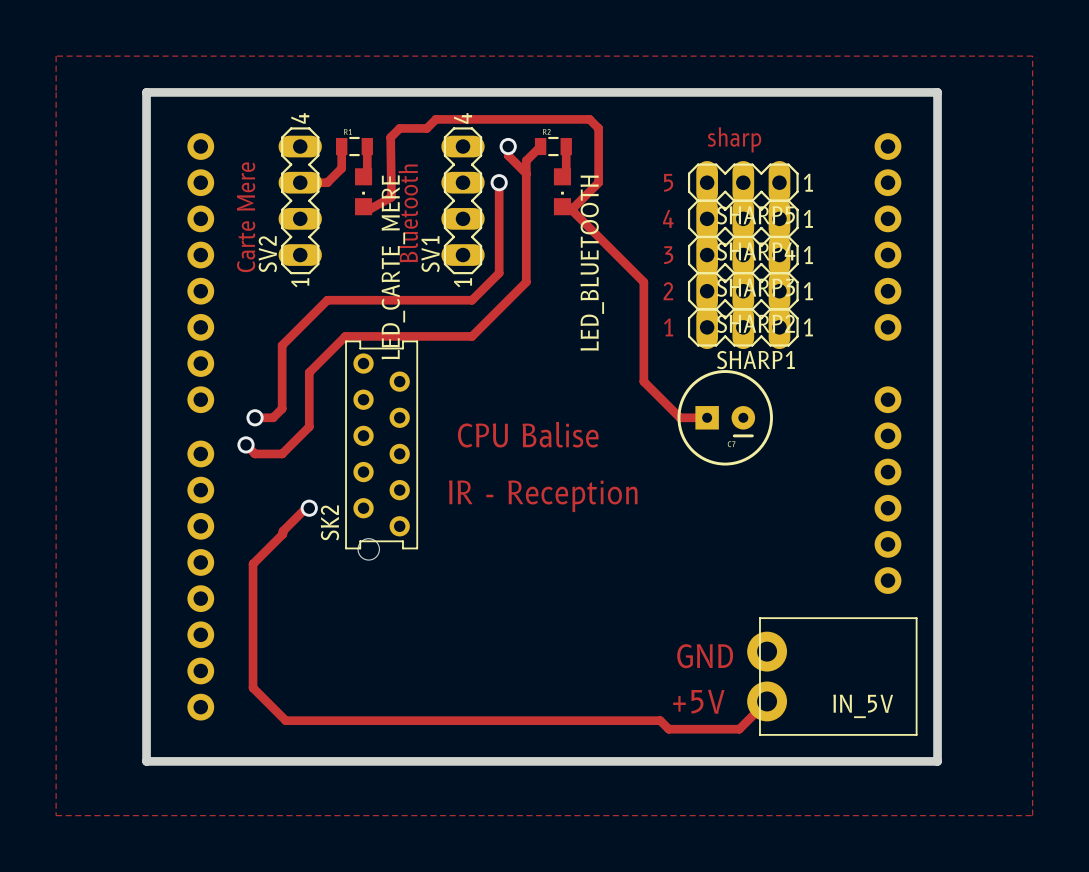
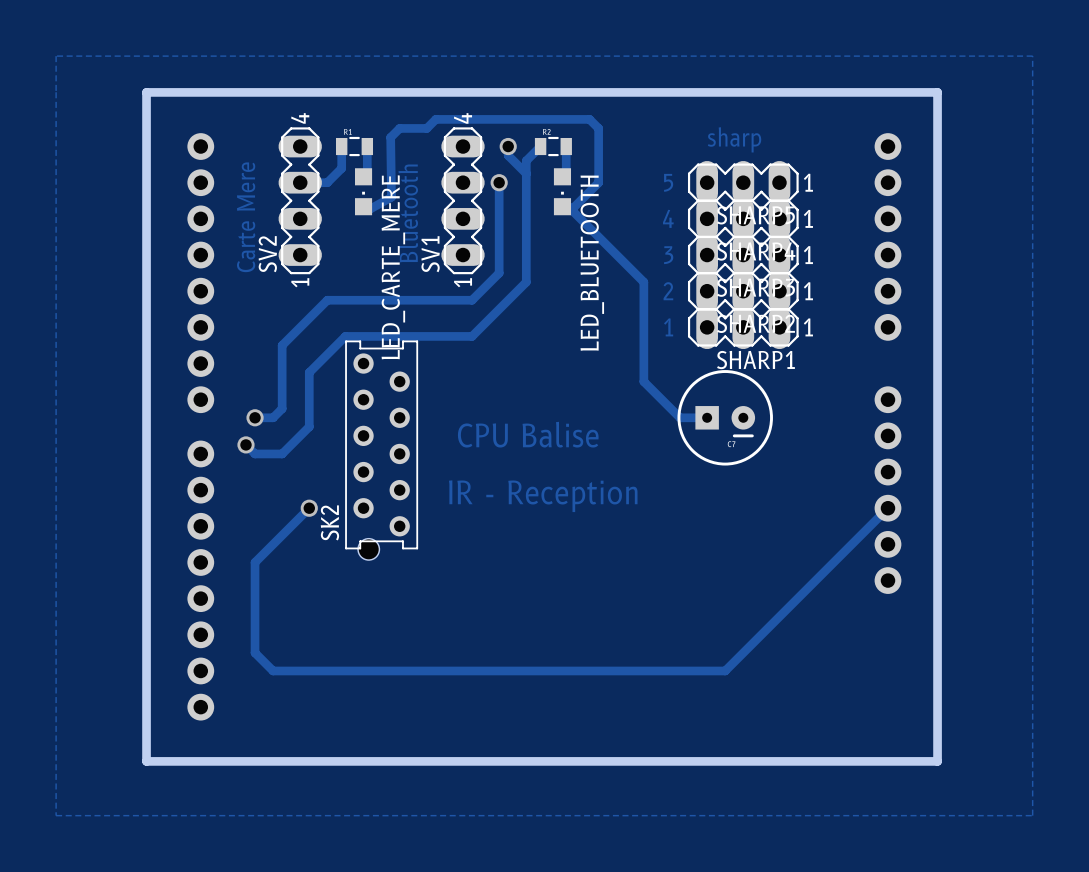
track: (309, 508) (306, 508) (253, 564) (253, 687) (285, 720) (660, 720) (668, 729) (739, 729) (767, 701) -> (309, 508) (255, 562) (255, 652) (273, 670) (725, 670) (887, 508)
text: GND (705, 656) -> none
IN_5V: (832, 676) -> none
text: +5V (698, 701) -> none

